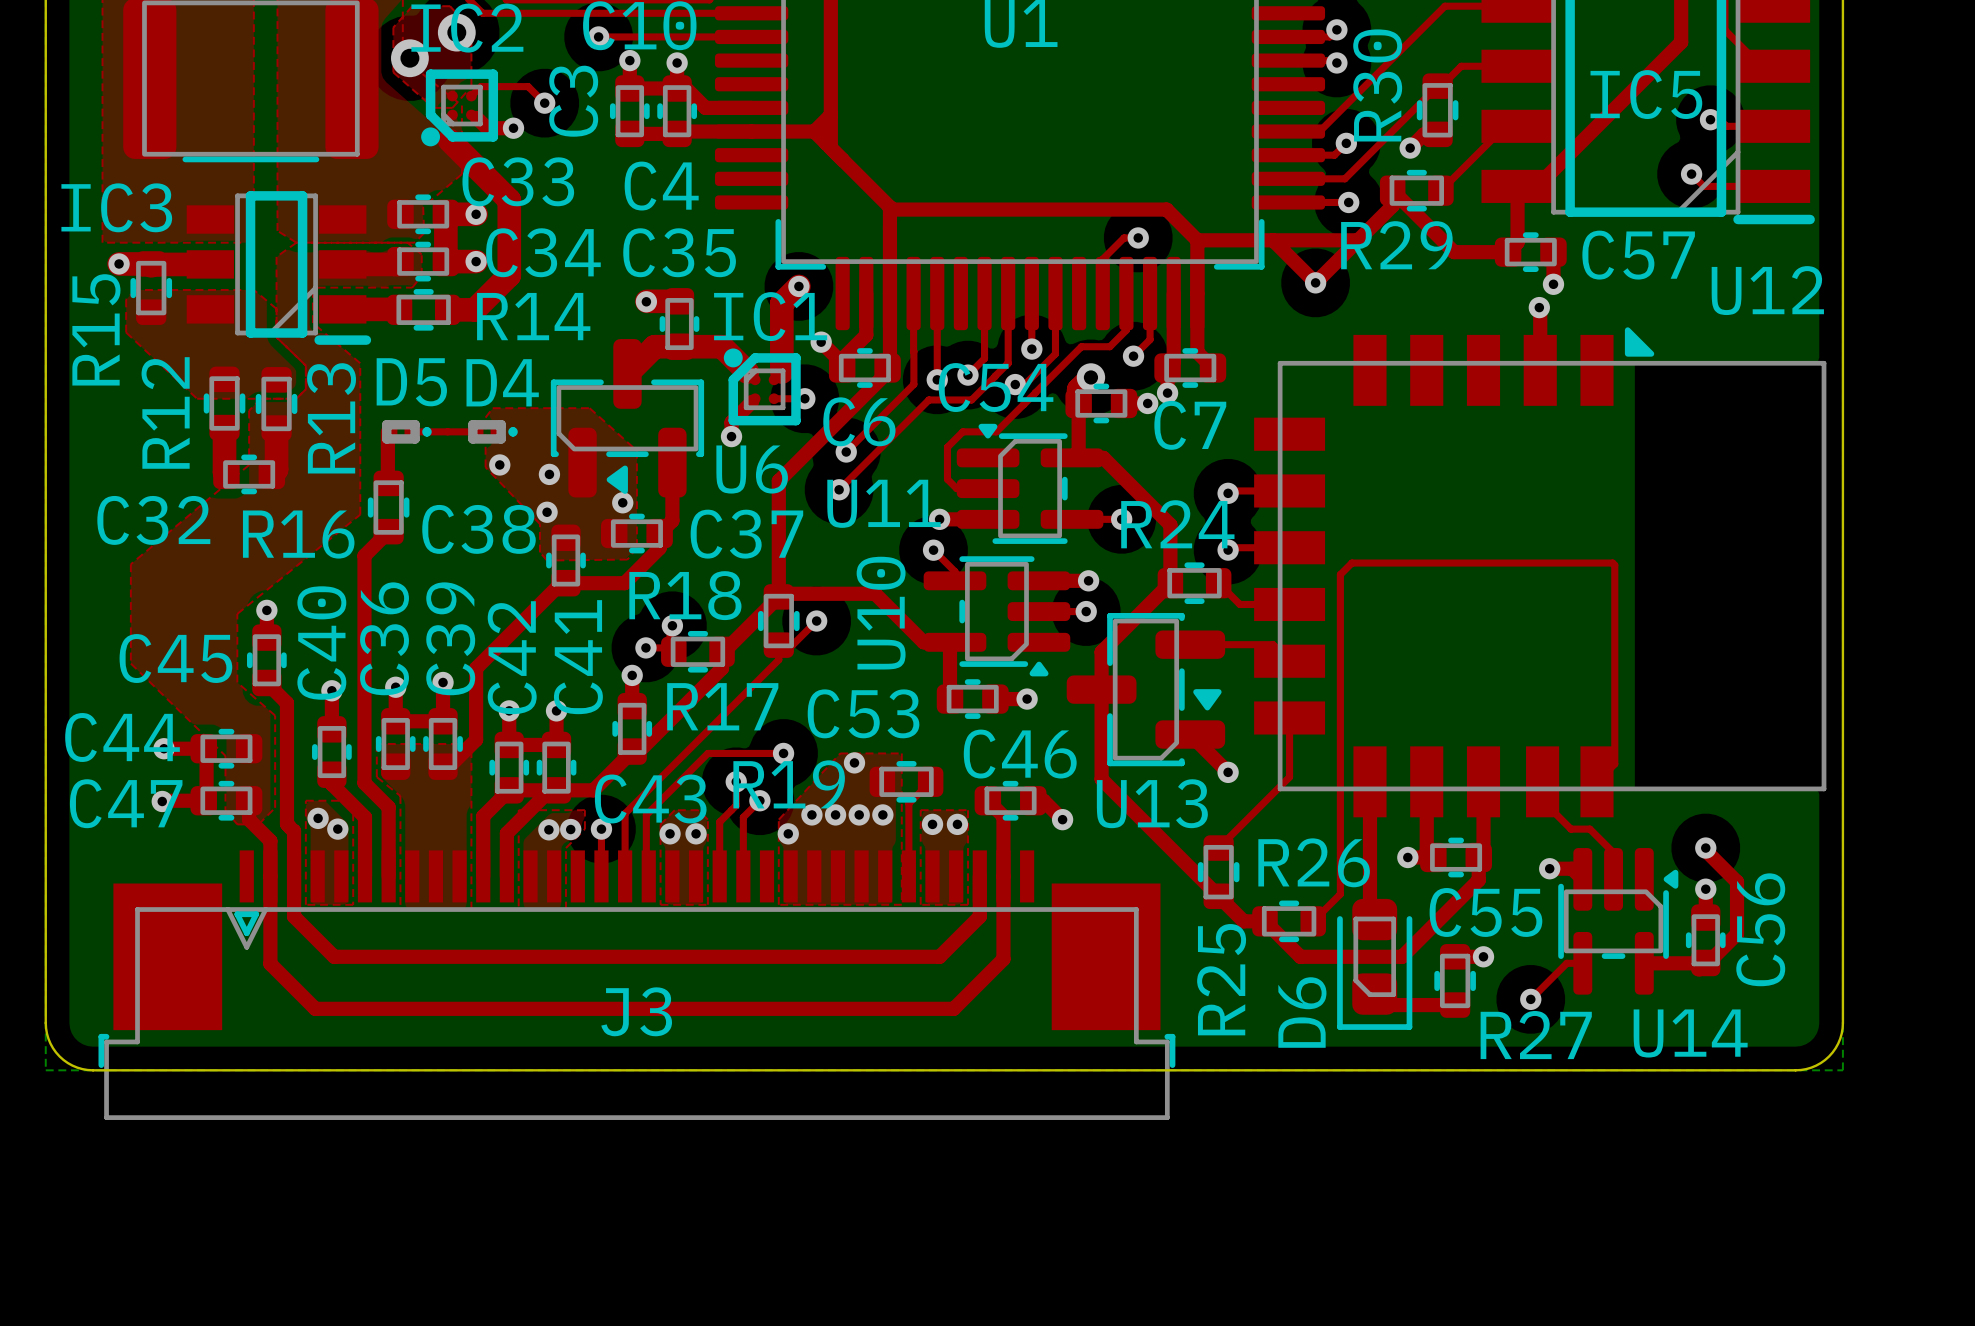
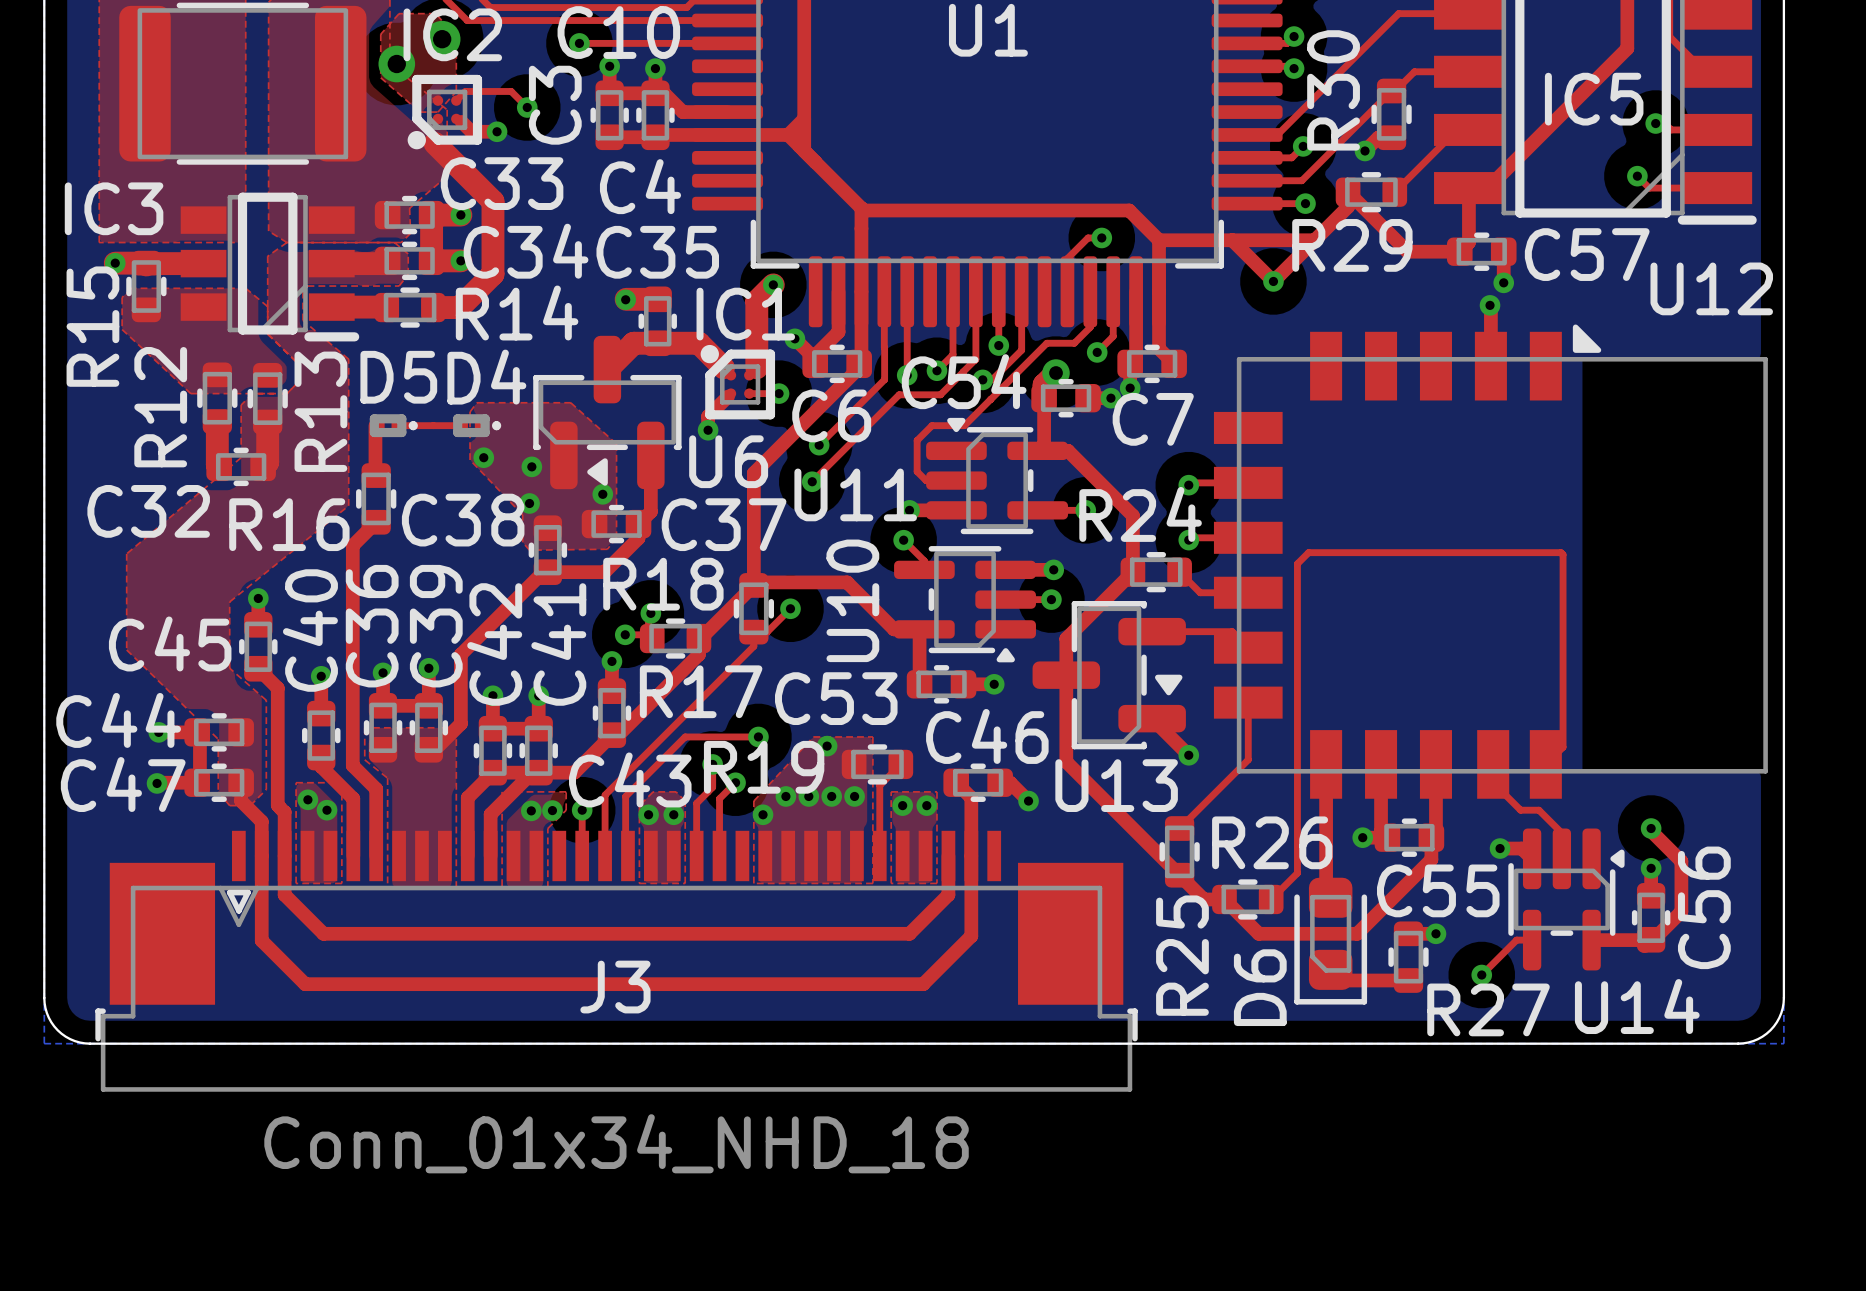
J3 value: none -> Conn_01x34_NHD_18 (616, 1143)

